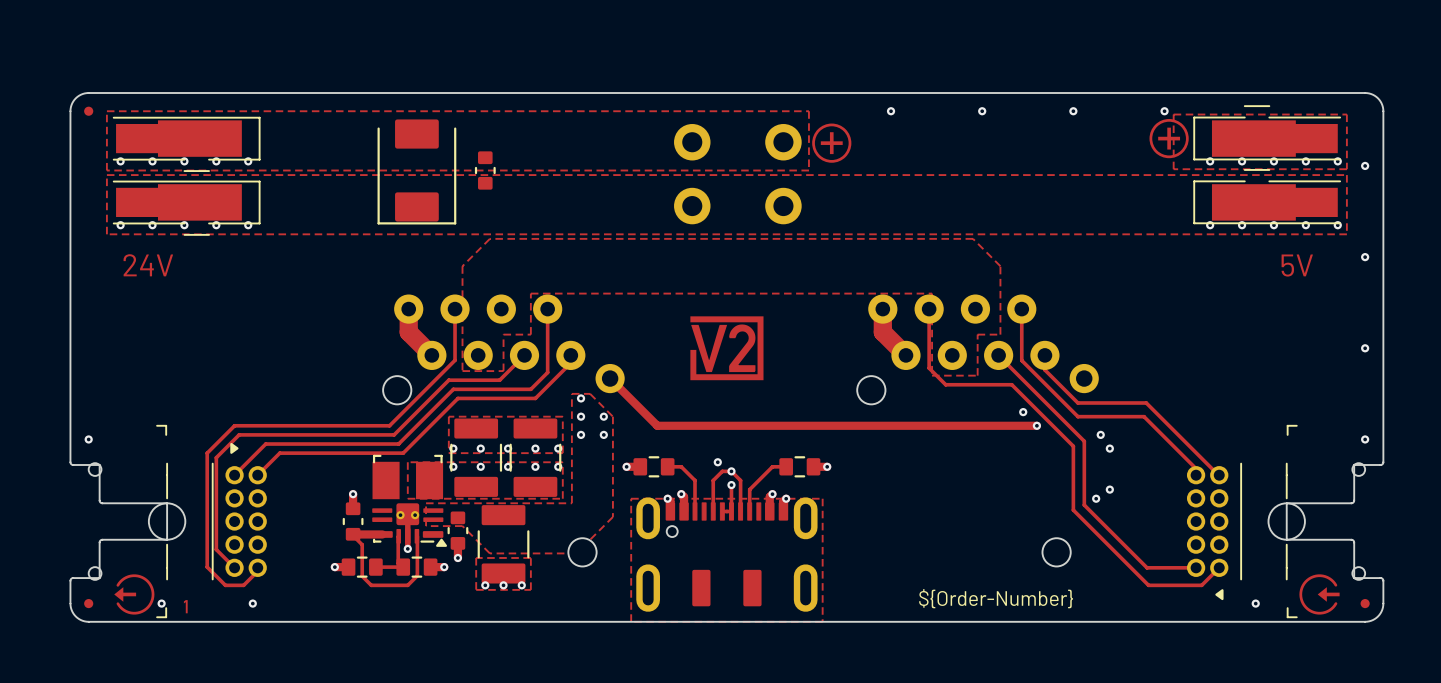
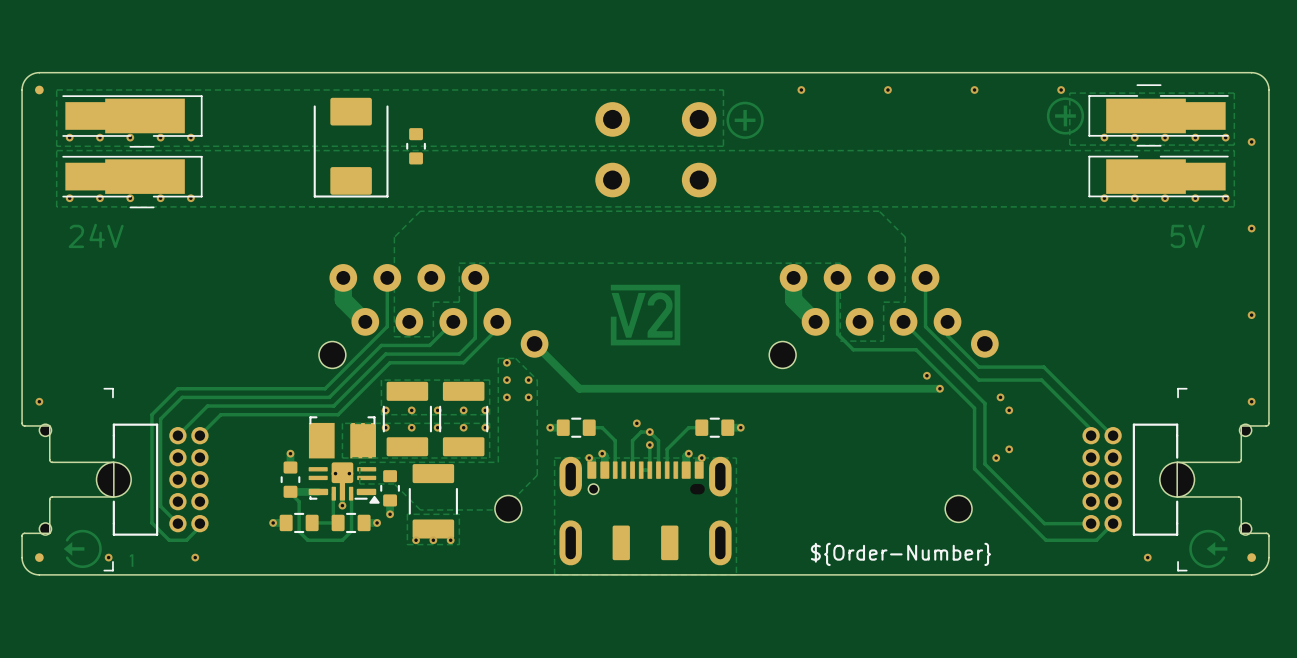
part footprint: [166, 442, 267, 581] -> [112, 423, 209, 536]
part footprint: [1186, 462, 1288, 601] -> [1082, 423, 1179, 536]

